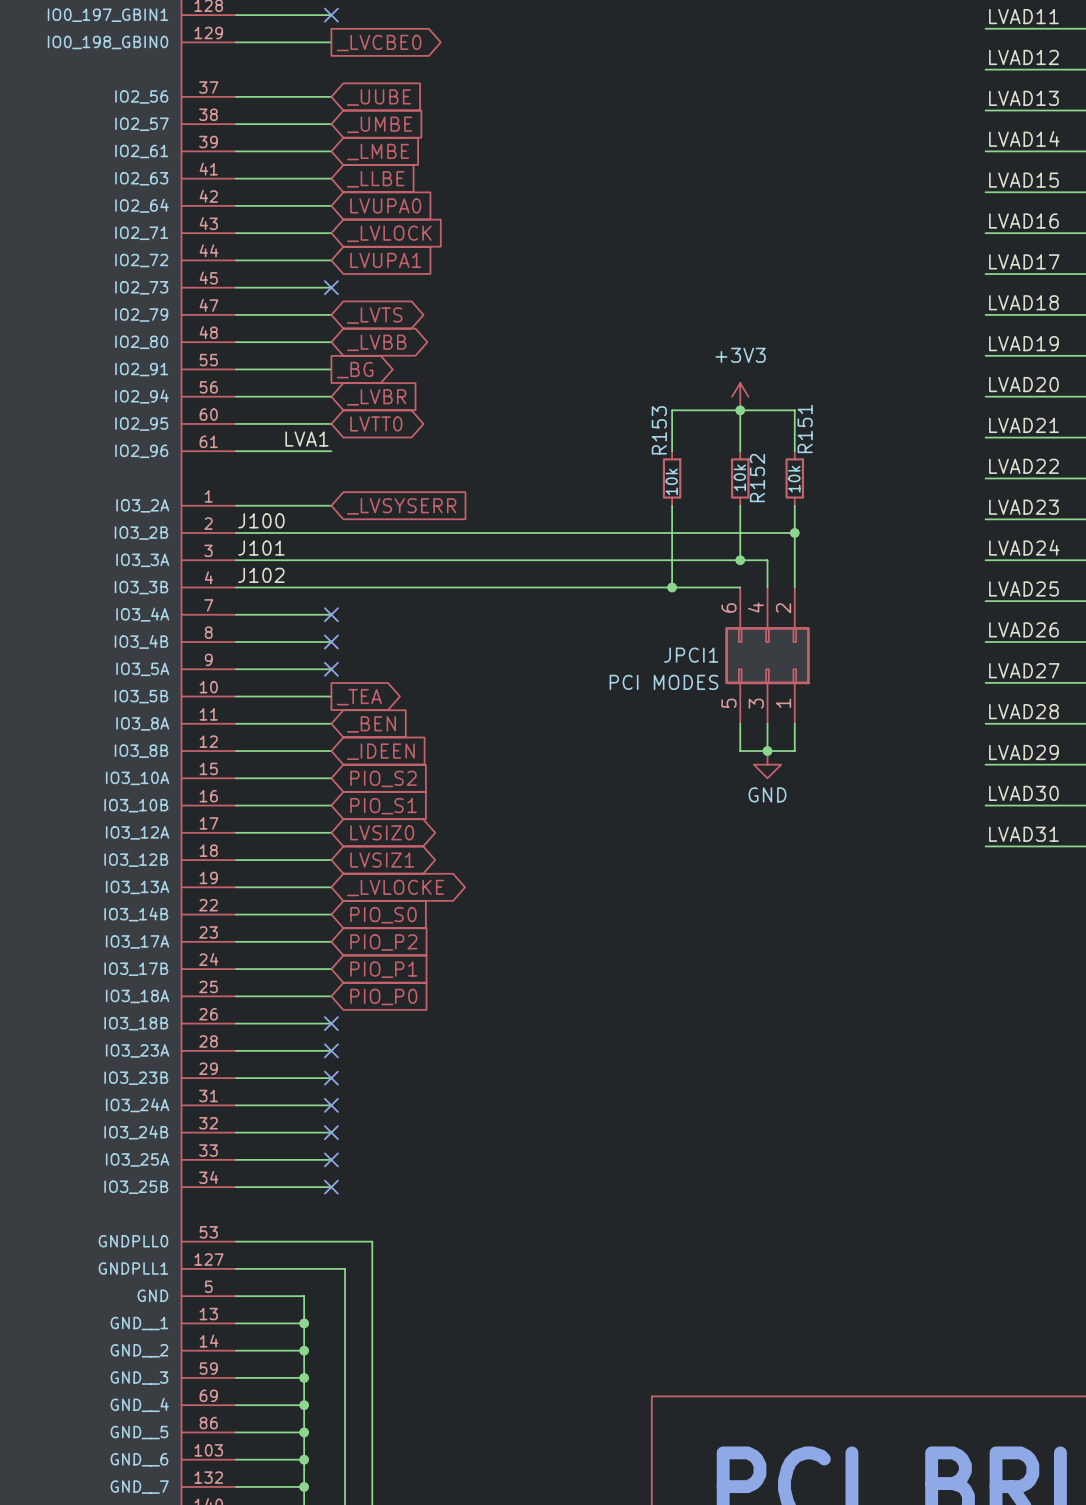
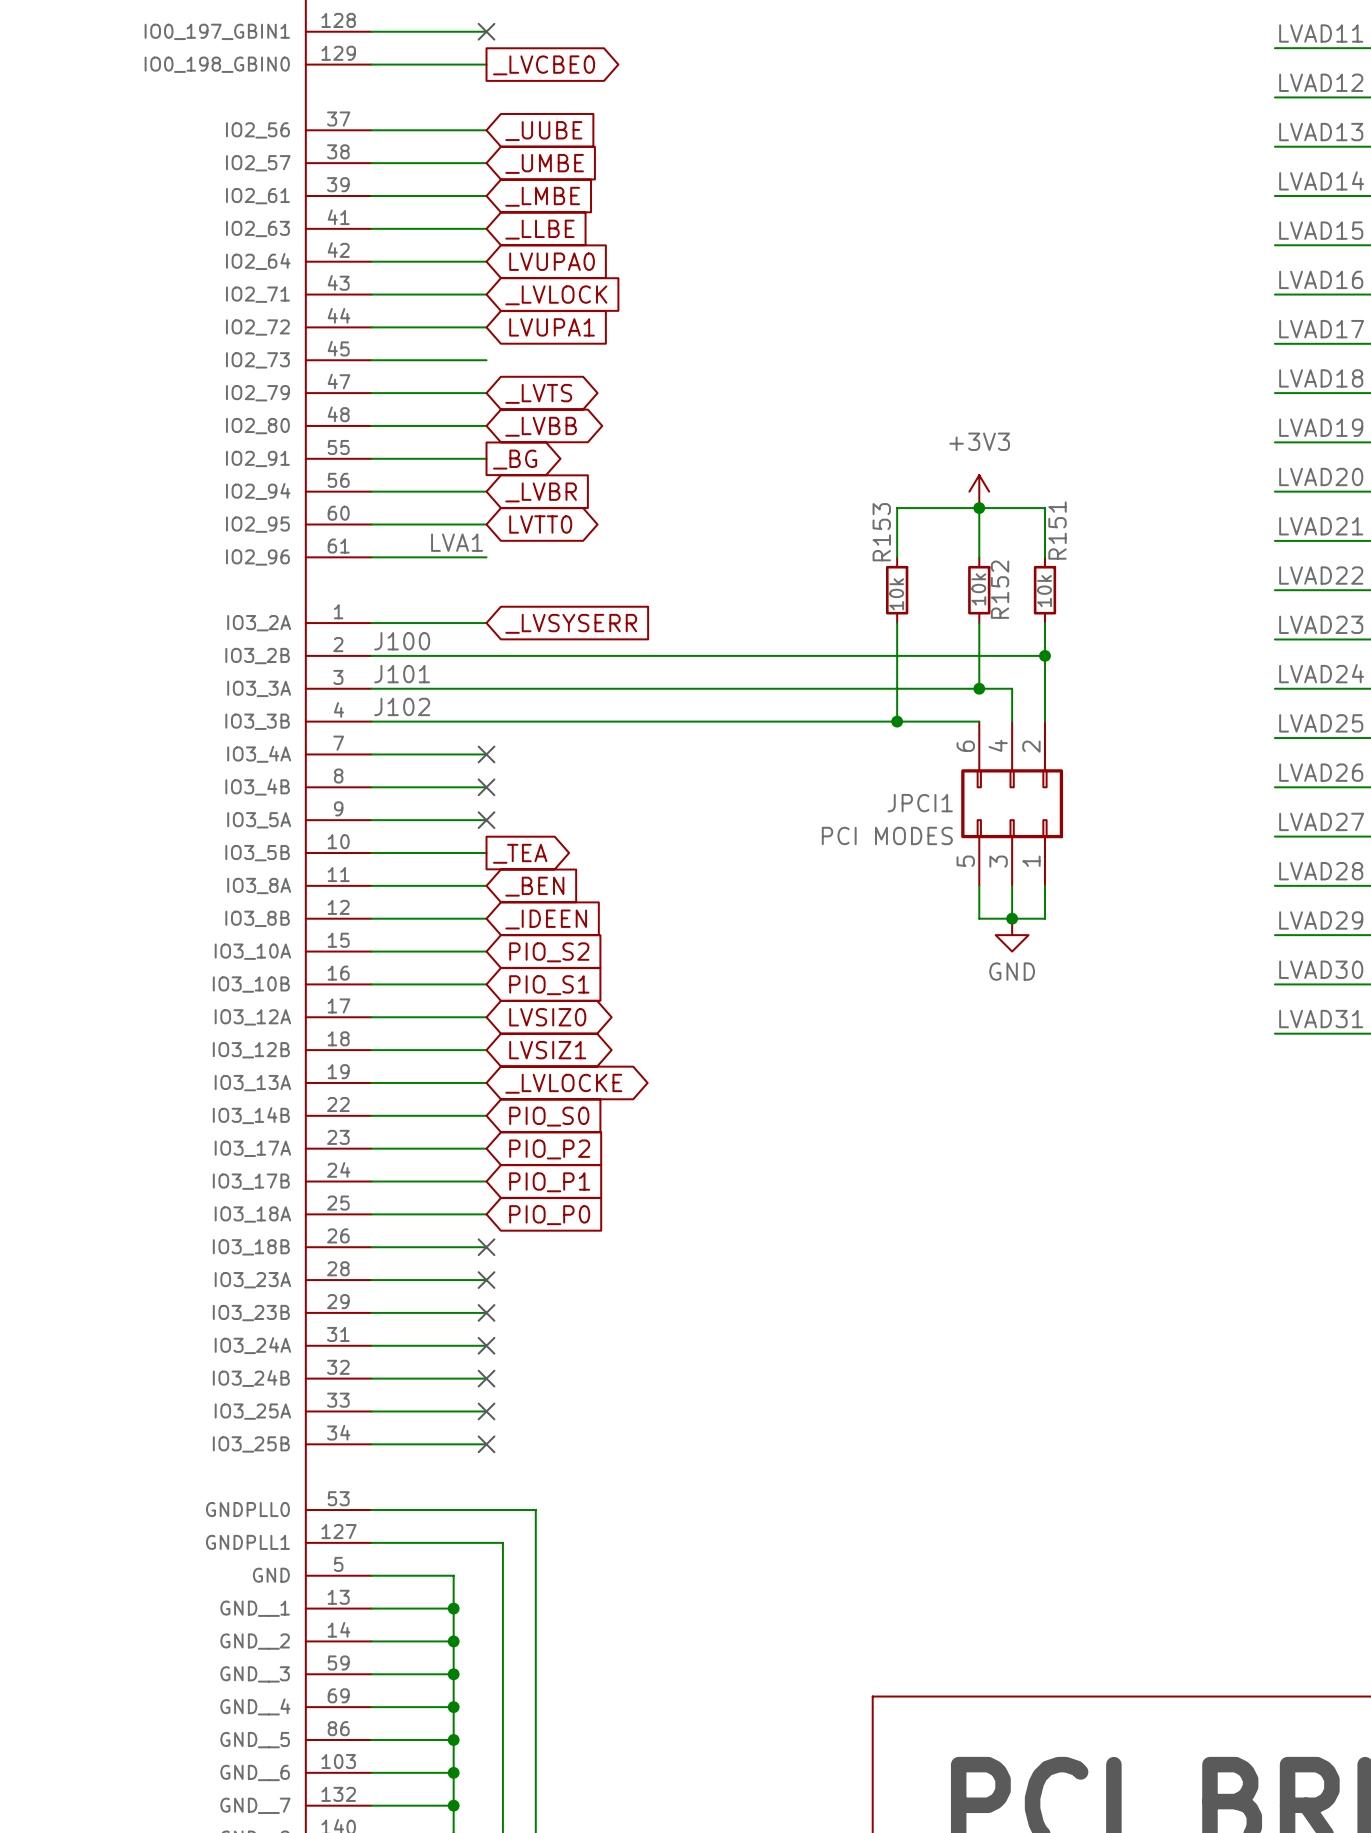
no-connect mark: (331, 287) -> none

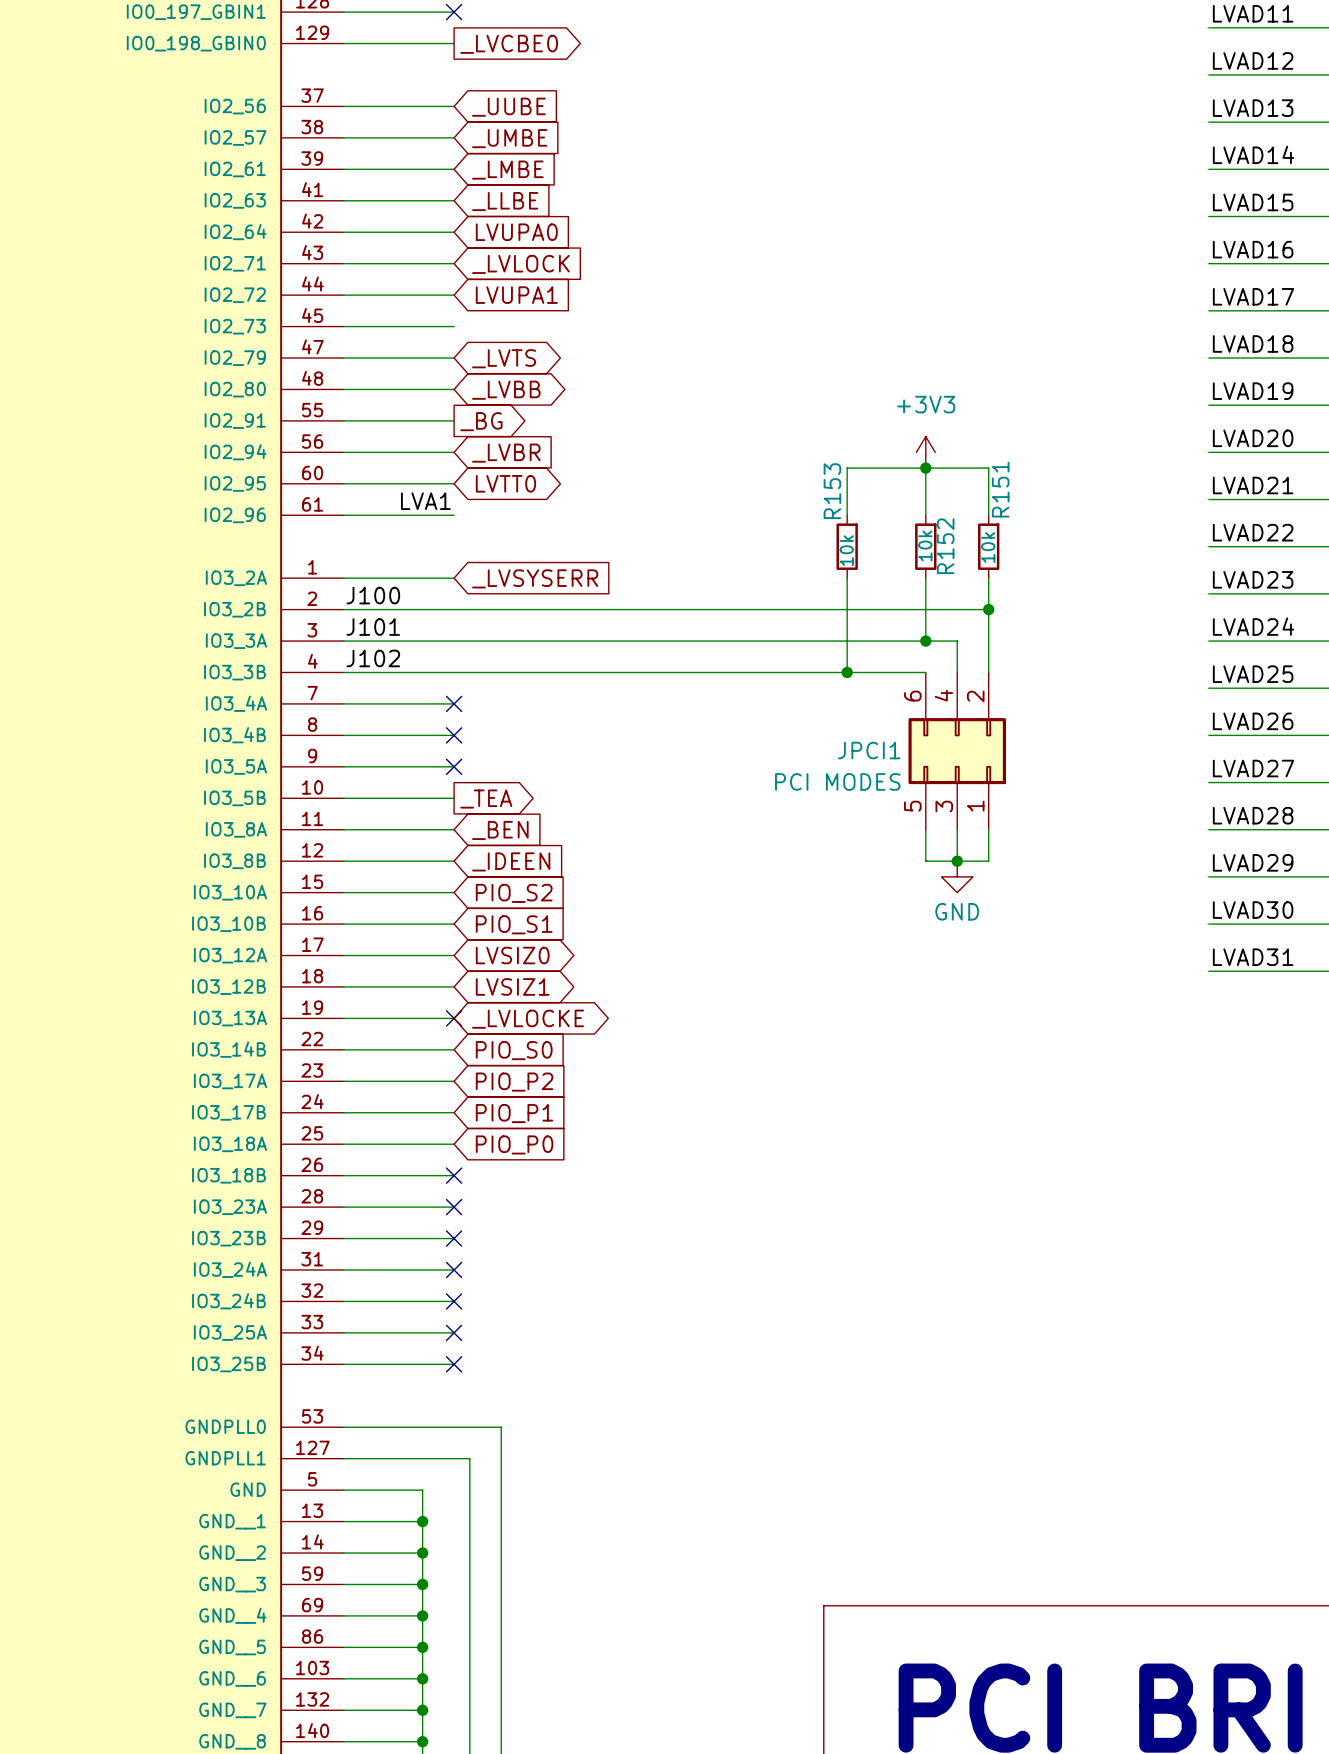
no-connect mark: none -> (454, 1018)

